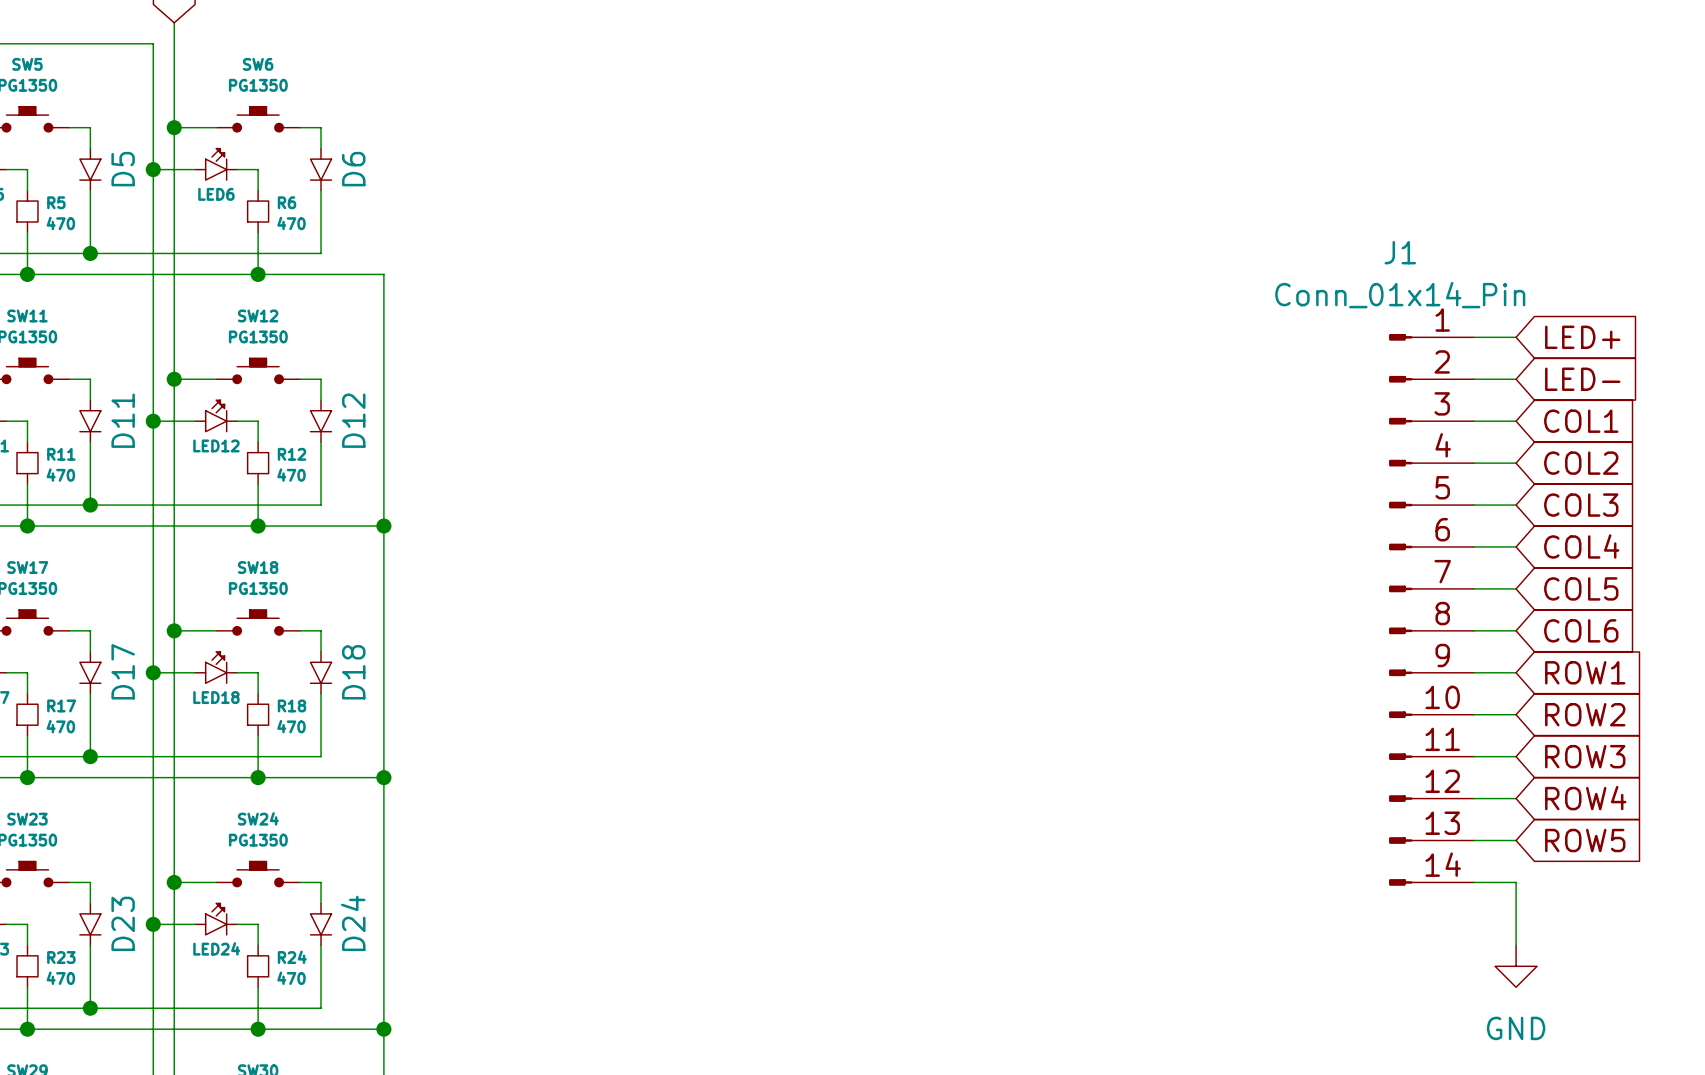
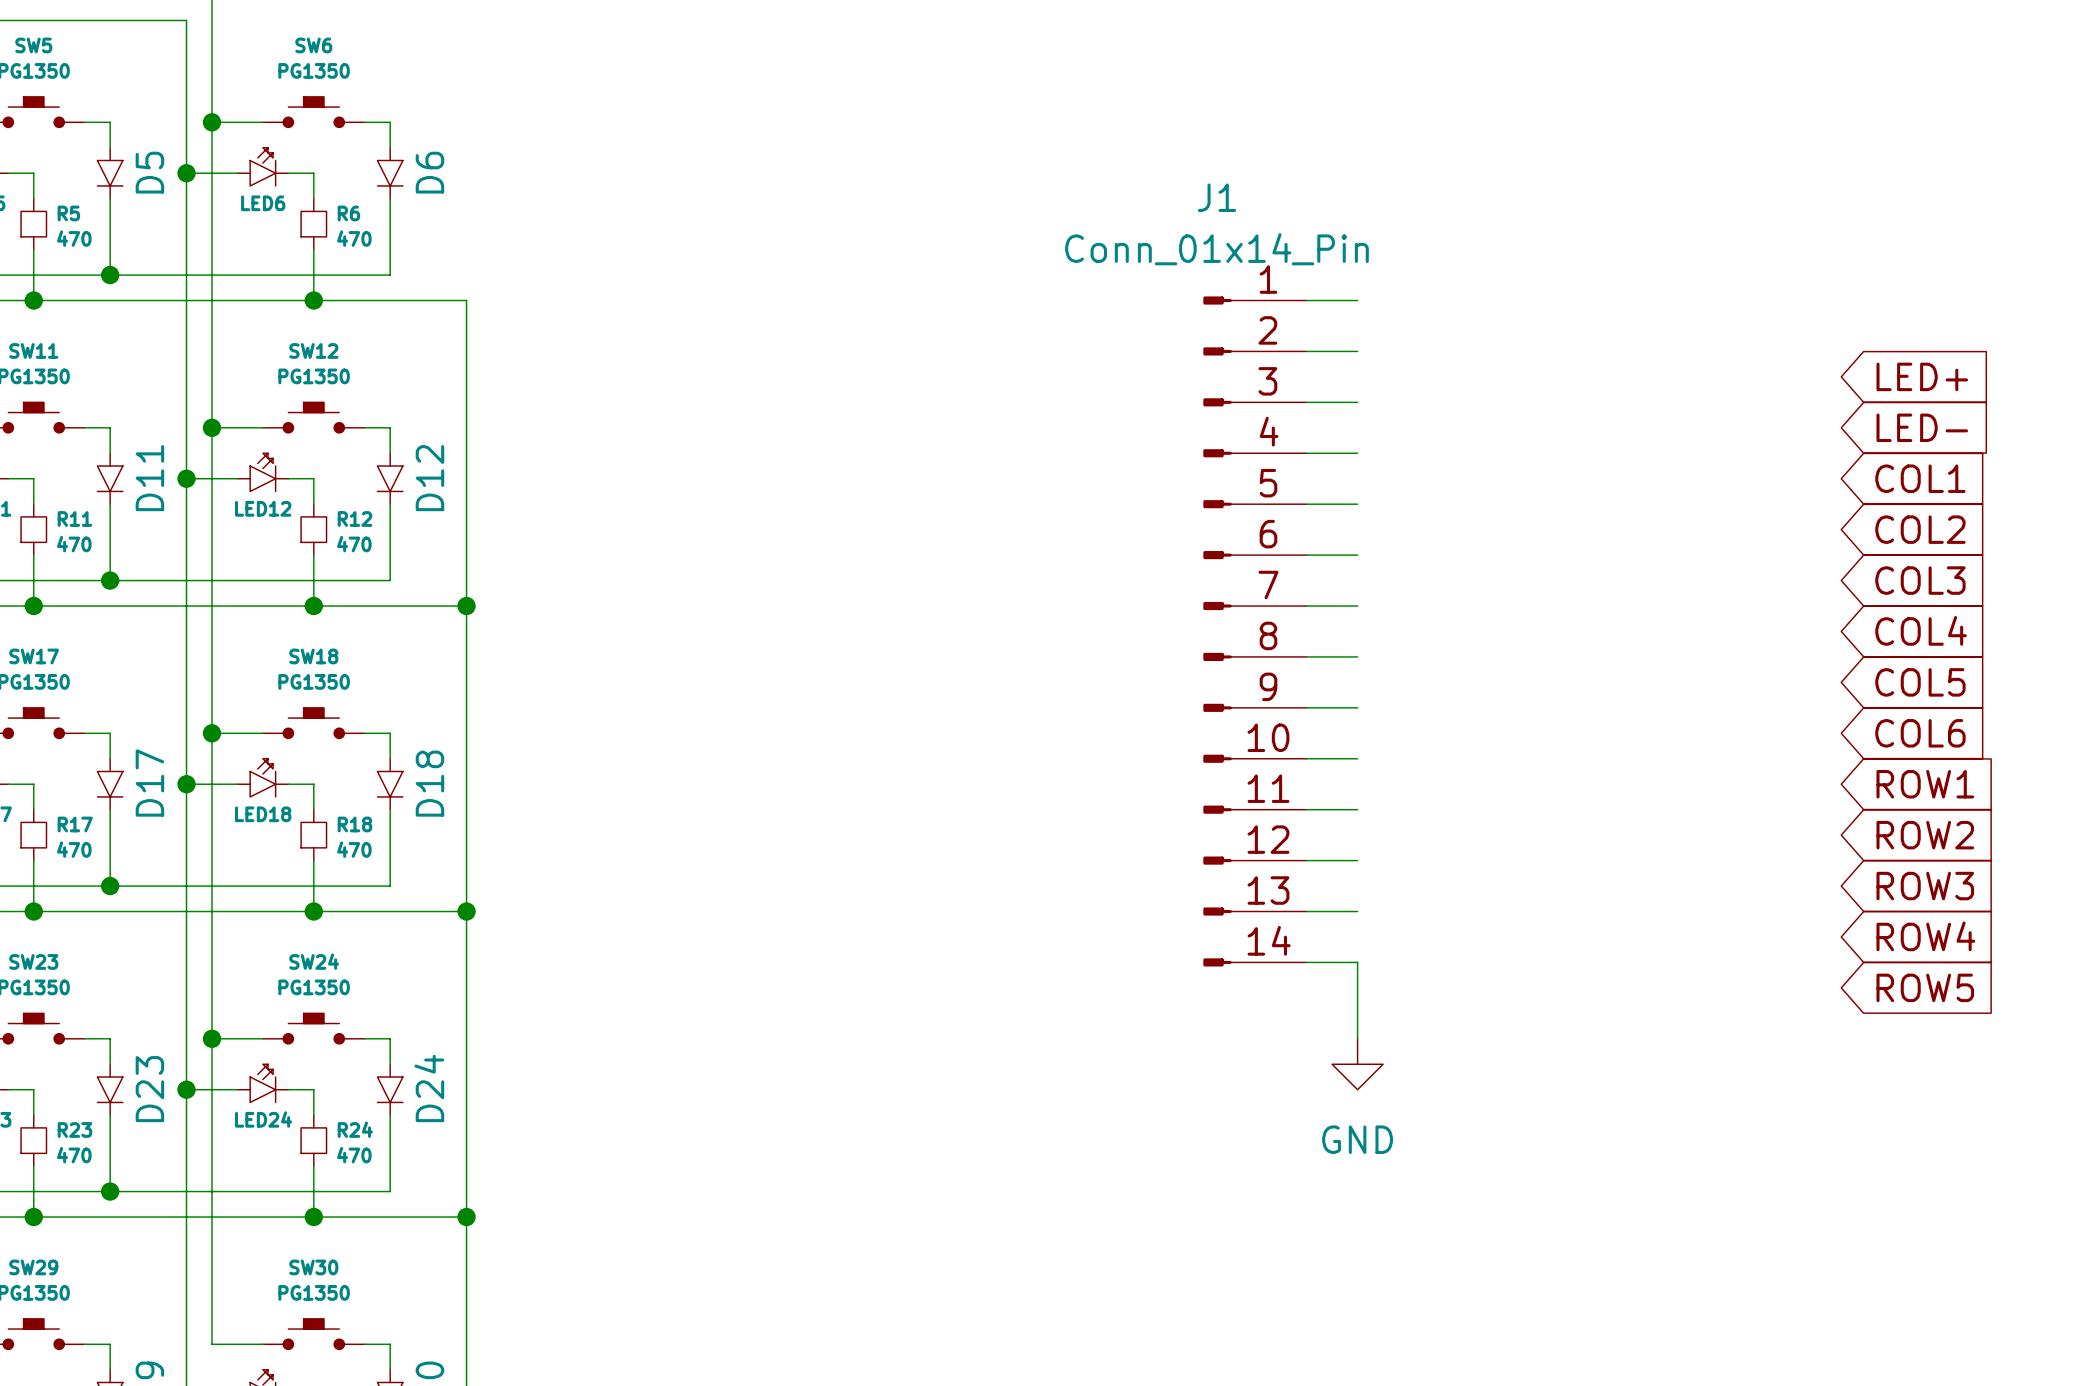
wire: (1474, 337) (1516, 337) -> (1306, 300) (1357, 300)
wire: (1474, 379) (1516, 379) -> (1306, 351) (1357, 351)
wire: (1474, 421) (1516, 421) -> (1306, 402) (1357, 402)
wire: (1474, 463) (1516, 463) -> (1306, 453) (1357, 453)
wire: (1474, 505) (1516, 505) -> (1306, 504) (1357, 504)
wire: (1474, 546) (1516, 546) -> (1306, 555) (1357, 555)
wire: (1474, 588) (1516, 588) -> (1306, 606) (1357, 606)
J1 position: (1431, 609) -> (1254, 631)
wire: (1474, 630) (1516, 630) -> (1306, 656) (1357, 656)
wire: (1474, 672) (1516, 672) -> (1306, 707) (1357, 707)
wire: (1474, 714) (1516, 714) -> (1306, 758) (1357, 758)
wire: (1474, 756) (1516, 756) -> (1306, 809) (1357, 809)
wire: (1474, 798) (1516, 798) -> (1306, 860) (1357, 860)
wire: (1474, 840) (1516, 840) -> (1306, 911) (1357, 911)
wire: (1474, 882) (1516, 882) (1516, 945) -> (1306, 962) (1357, 962) (1357, 1038)
power symbol position: GND (1516, 966) -> GND (1357, 1064)

